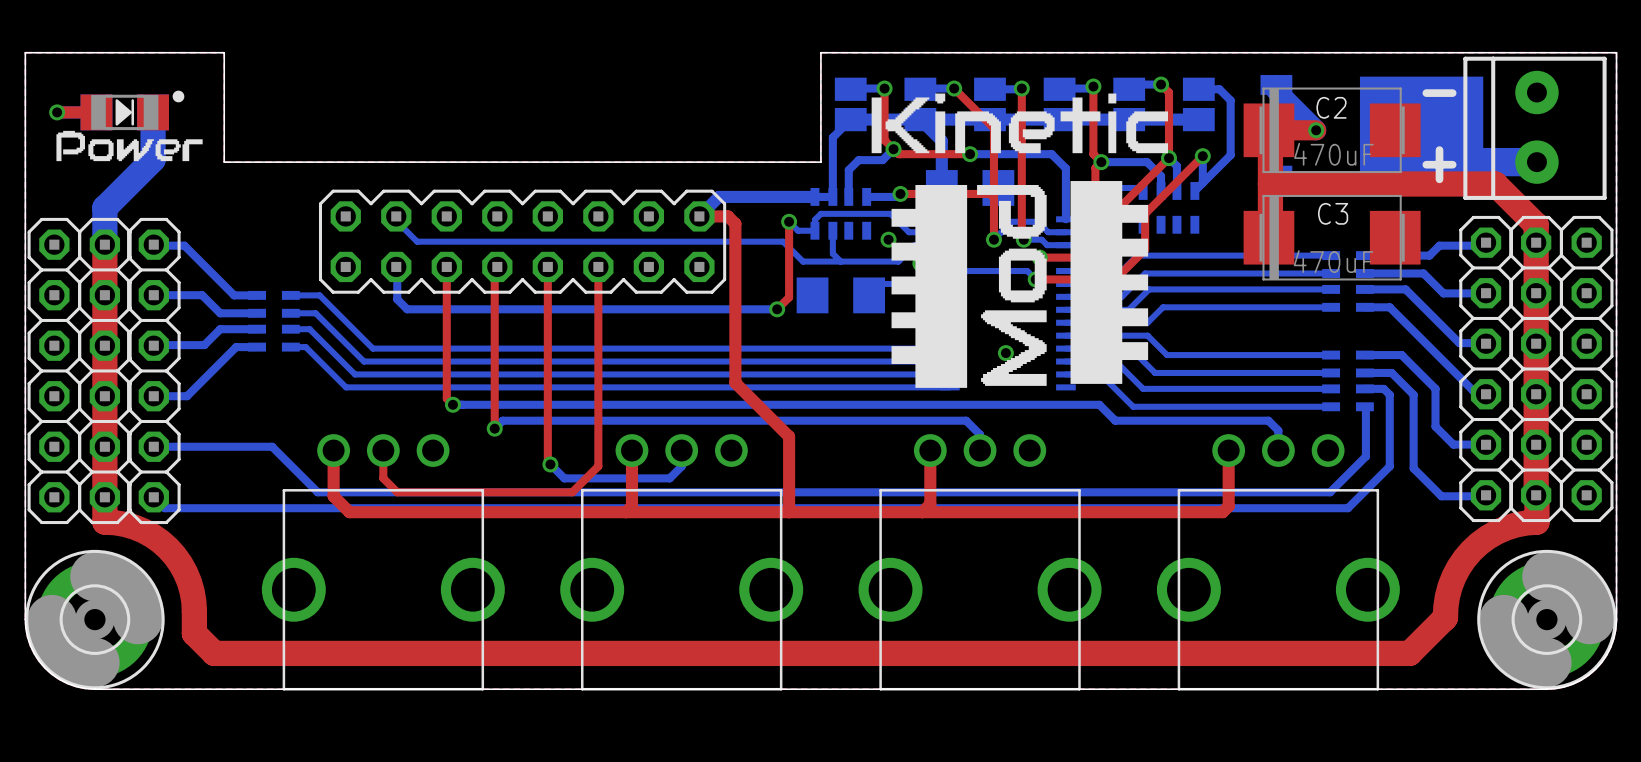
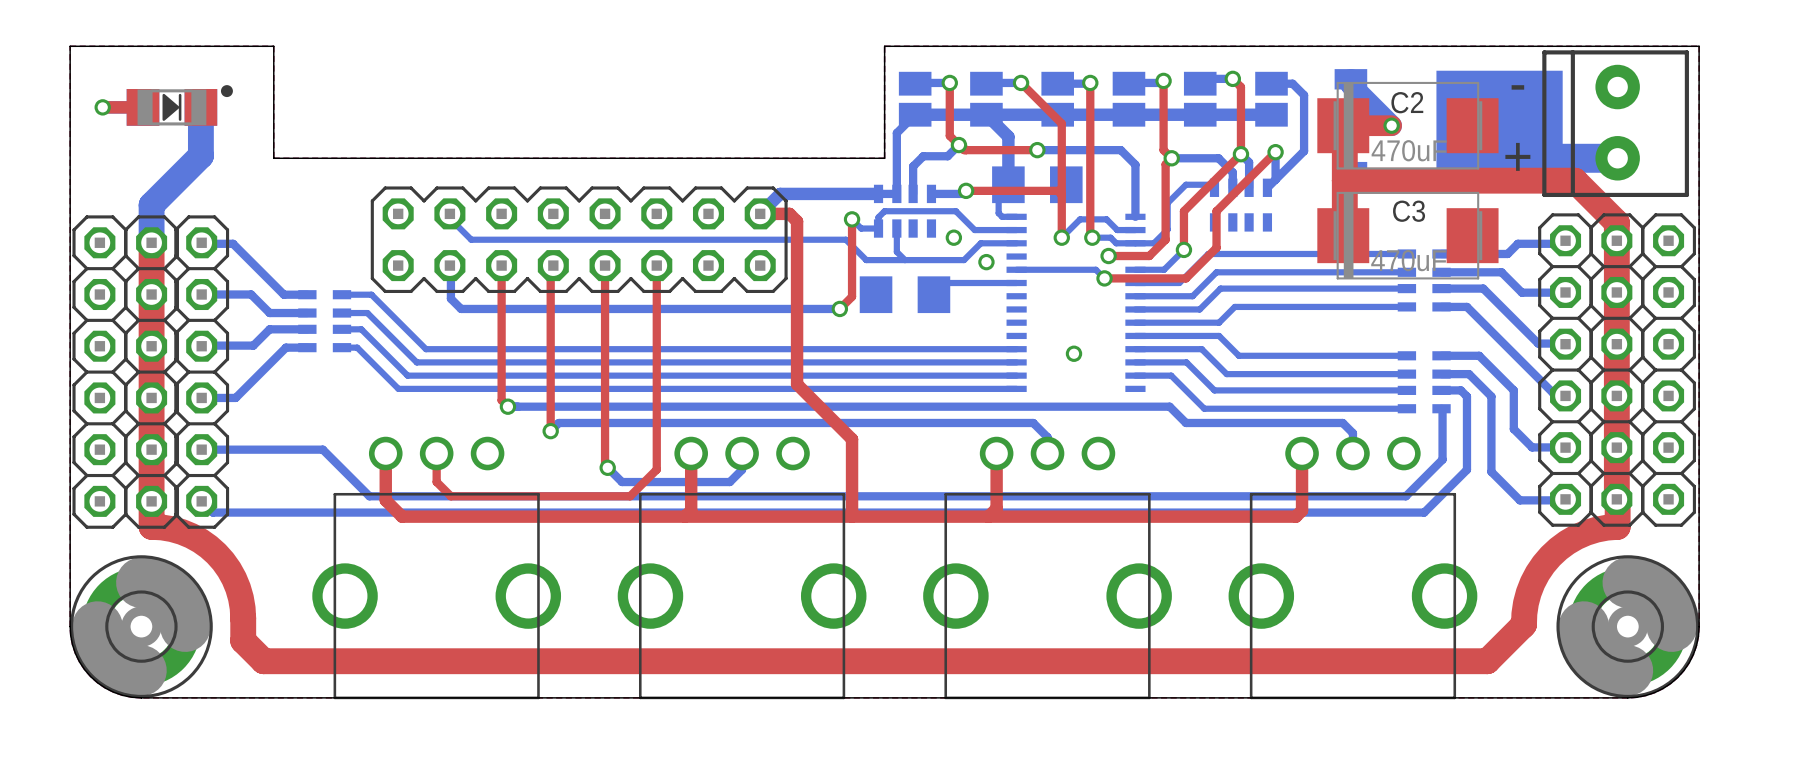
drawing: [871, 93, 1169, 154] -> none
drawing: [56, 130, 203, 162] -> none
drawing: [891, 181, 1149, 388] -> none

